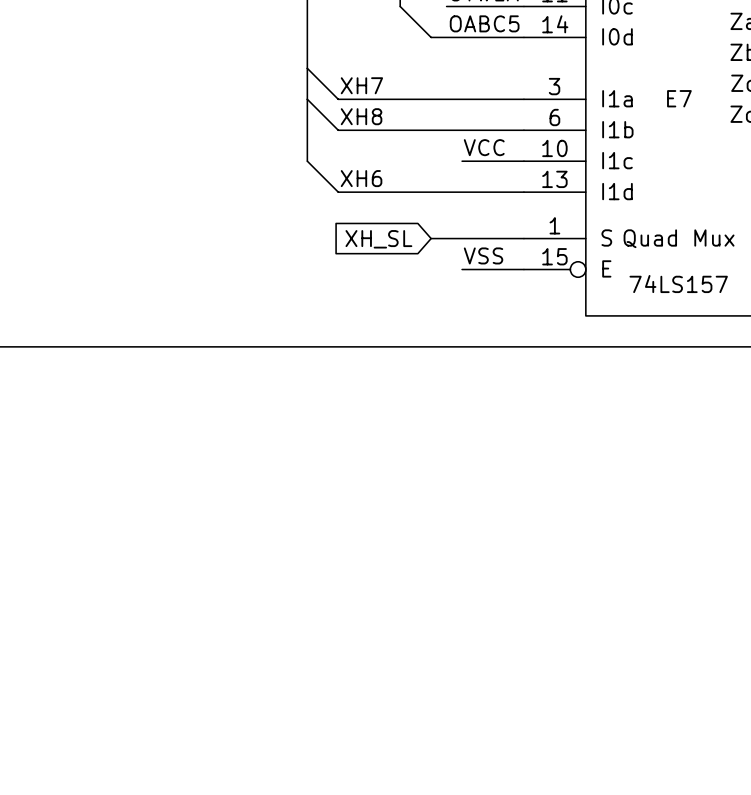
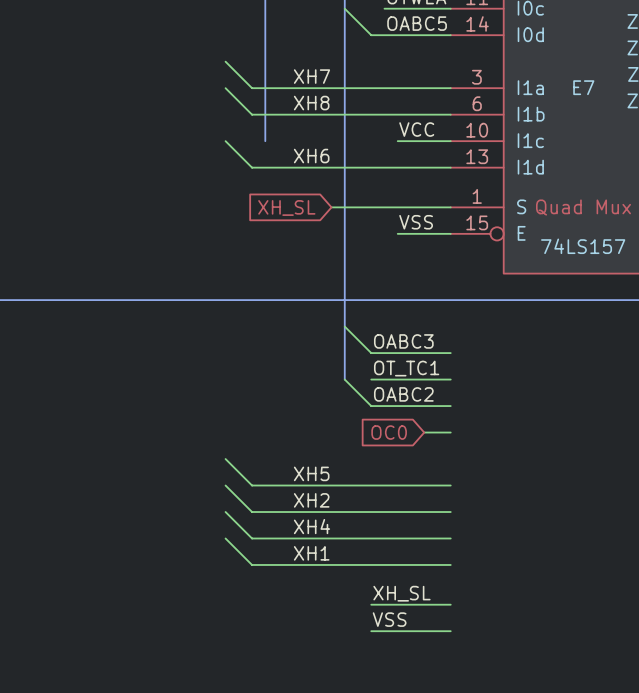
bus: none -> (344, 8) (344, 379)
wire: (307, 68) (338, 99) -> (225, 61) (252, 88) (291, 88)
wire: (307, 99) (338, 130) -> (225, 88) (252, 114) (291, 114)
wire: (307, 161) (338, 192) -> (225, 141) (252, 167) (291, 167)
wire: none -> (331, 207) (371, 207)
global label position: XH_SL (378, 239) -> XH_SL (286, 207)
wire: none -> (344, 326) (371, 353) (450, 353)
label: none -> OABC3 (403, 341)
label: none -> OT_TC1 (406, 368)
wire: none -> (344, 379) (371, 406) (450, 406)
wire: none -> (371, 379) (450, 379)
label: none -> OABC2 (403, 394)
global label: none -> OC0 (389, 432)
wire: none -> (424, 432) (450, 432)
wire: none -> (225, 459) (252, 485) (450, 485)
label: none -> XH5 (311, 473)
wire: none -> (225, 485) (252, 512) (450, 512)
label: none -> XH2 (311, 500)
wire: none -> (225, 512) (252, 538) (450, 538)
label: none -> XH4 (312, 526)
wire: none -> (225, 538) (252, 564) (450, 564)
label: none -> XH1 (311, 553)
label: none -> XH_SL (401, 593)
wire: none -> (371, 604) (450, 604)
label: none -> VSS (389, 619)
wire: none -> (371, 631) (450, 631)

